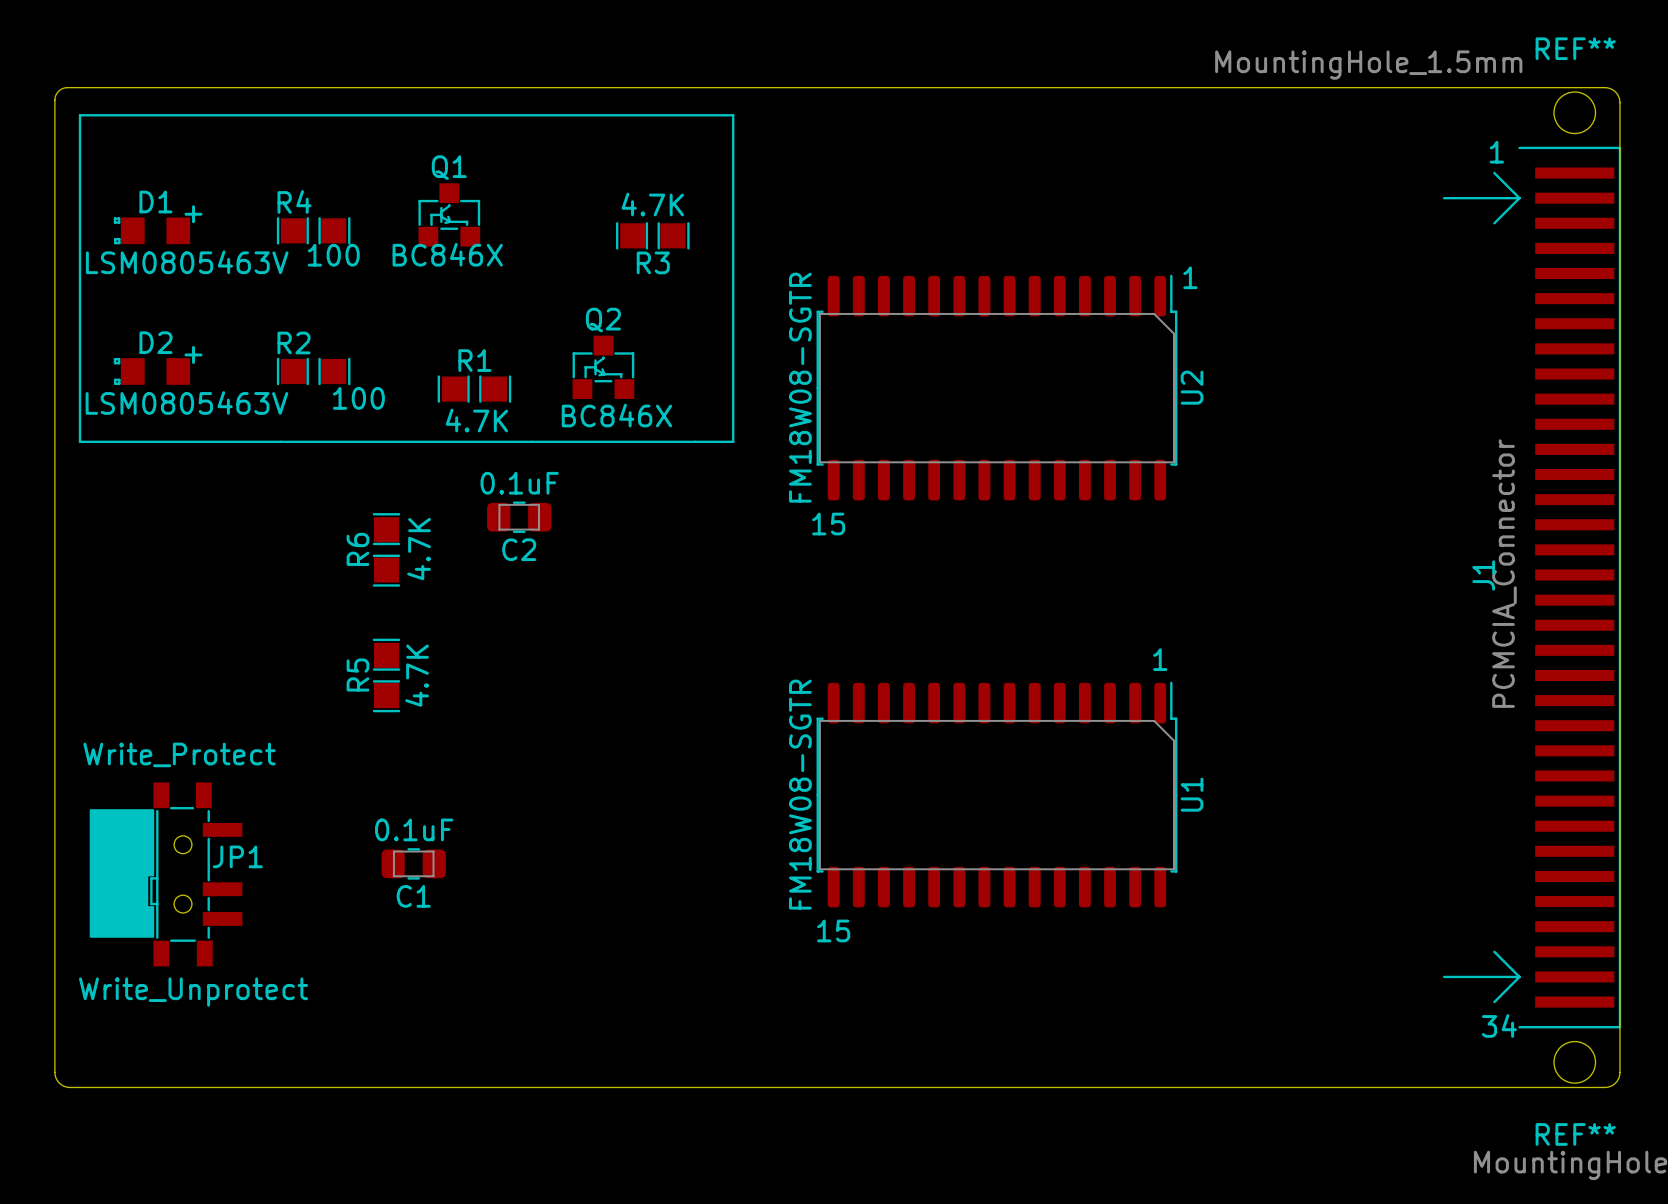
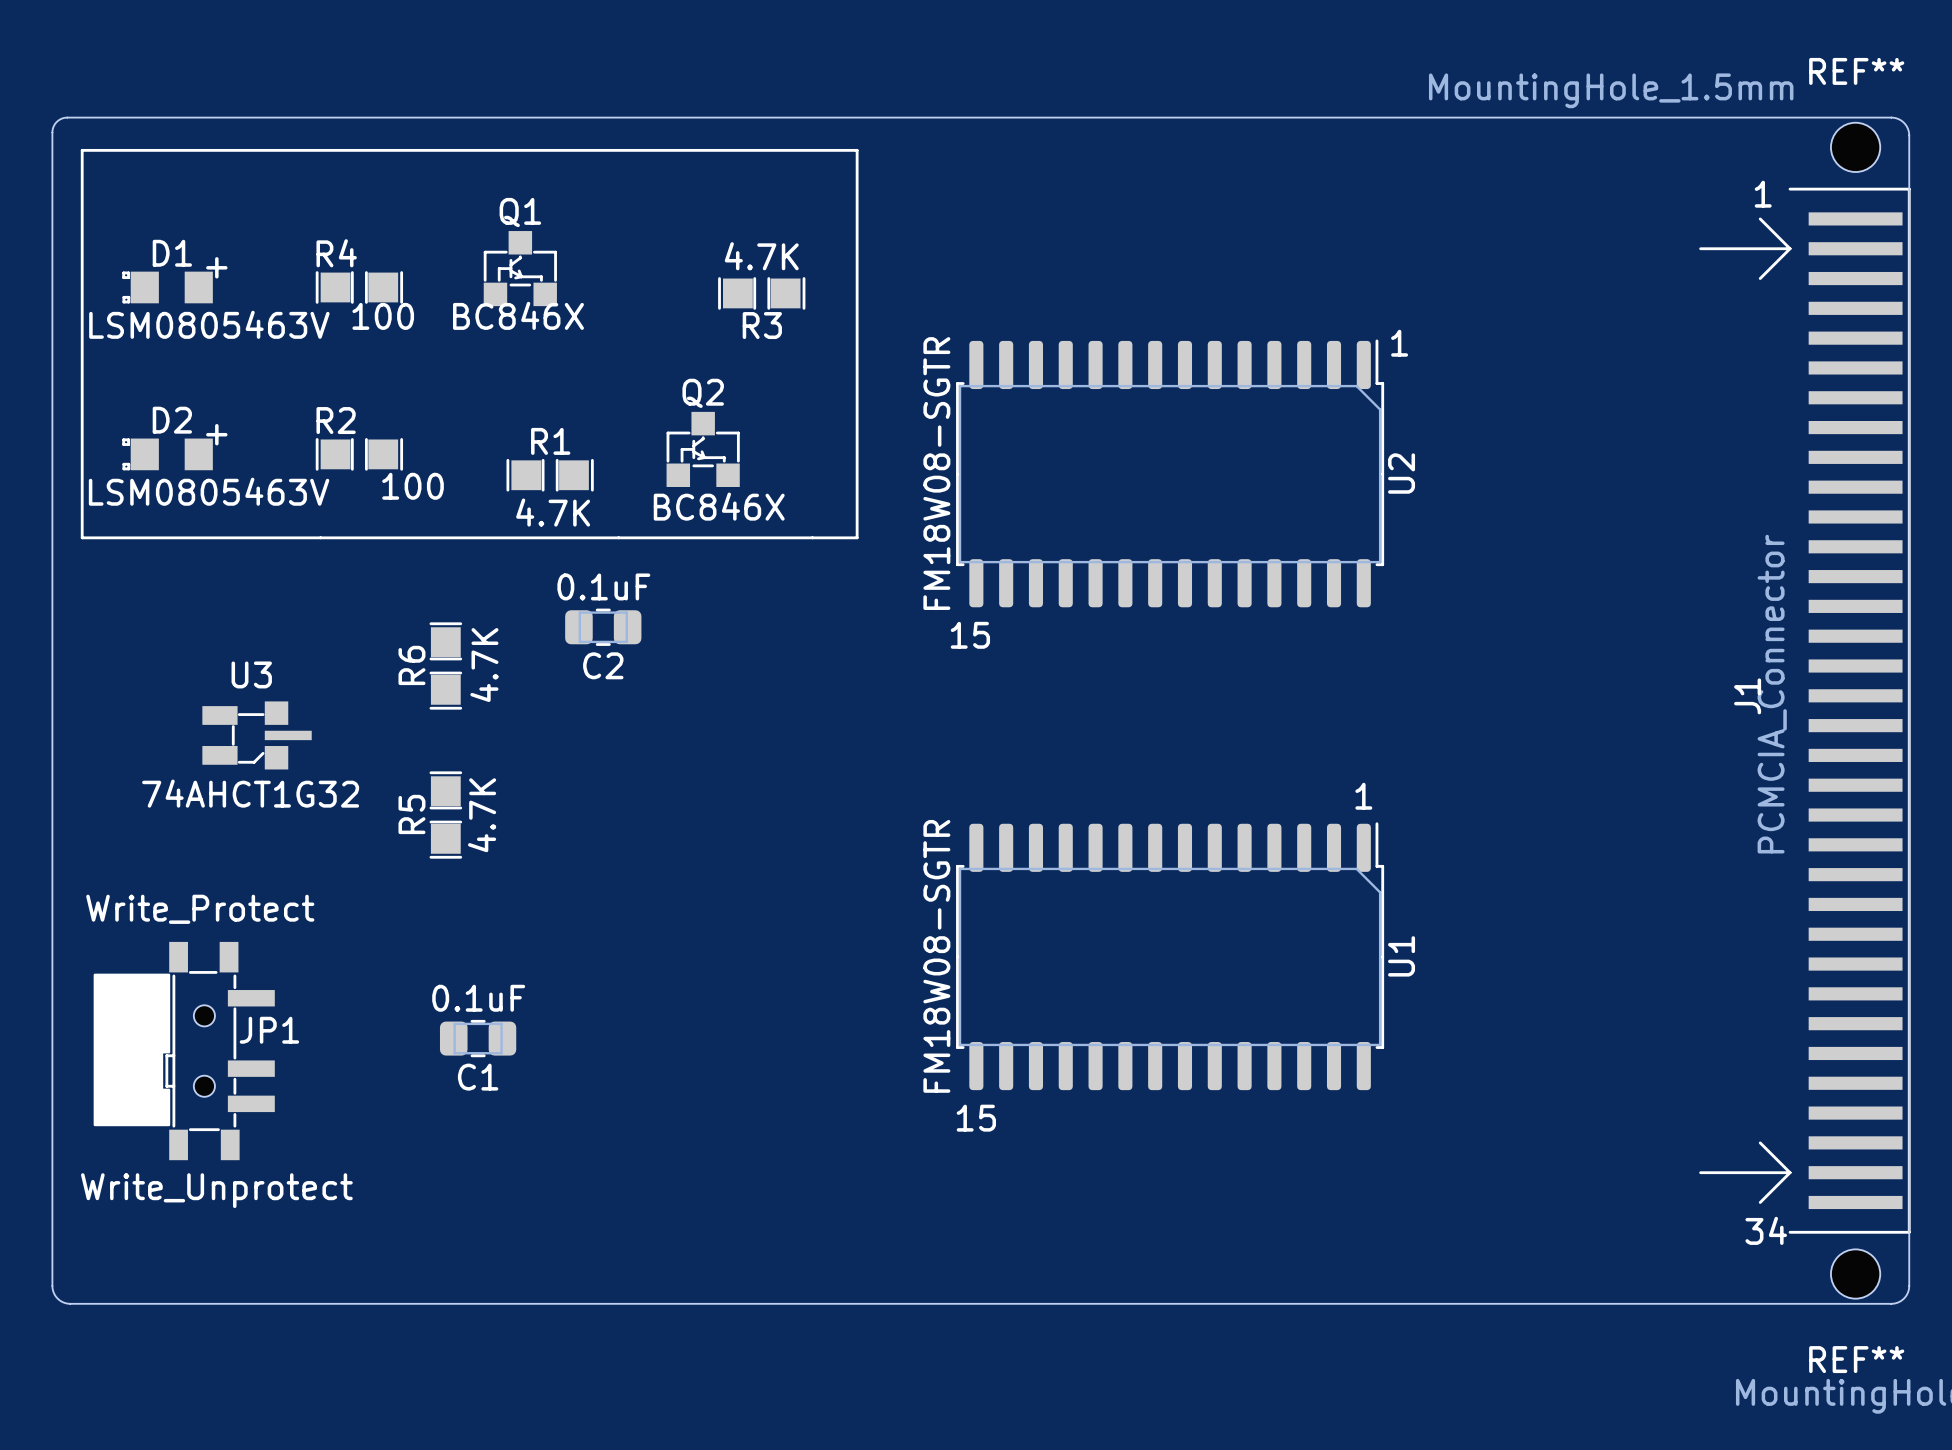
U3: none -> 74AHCT1G32 (257, 735)

